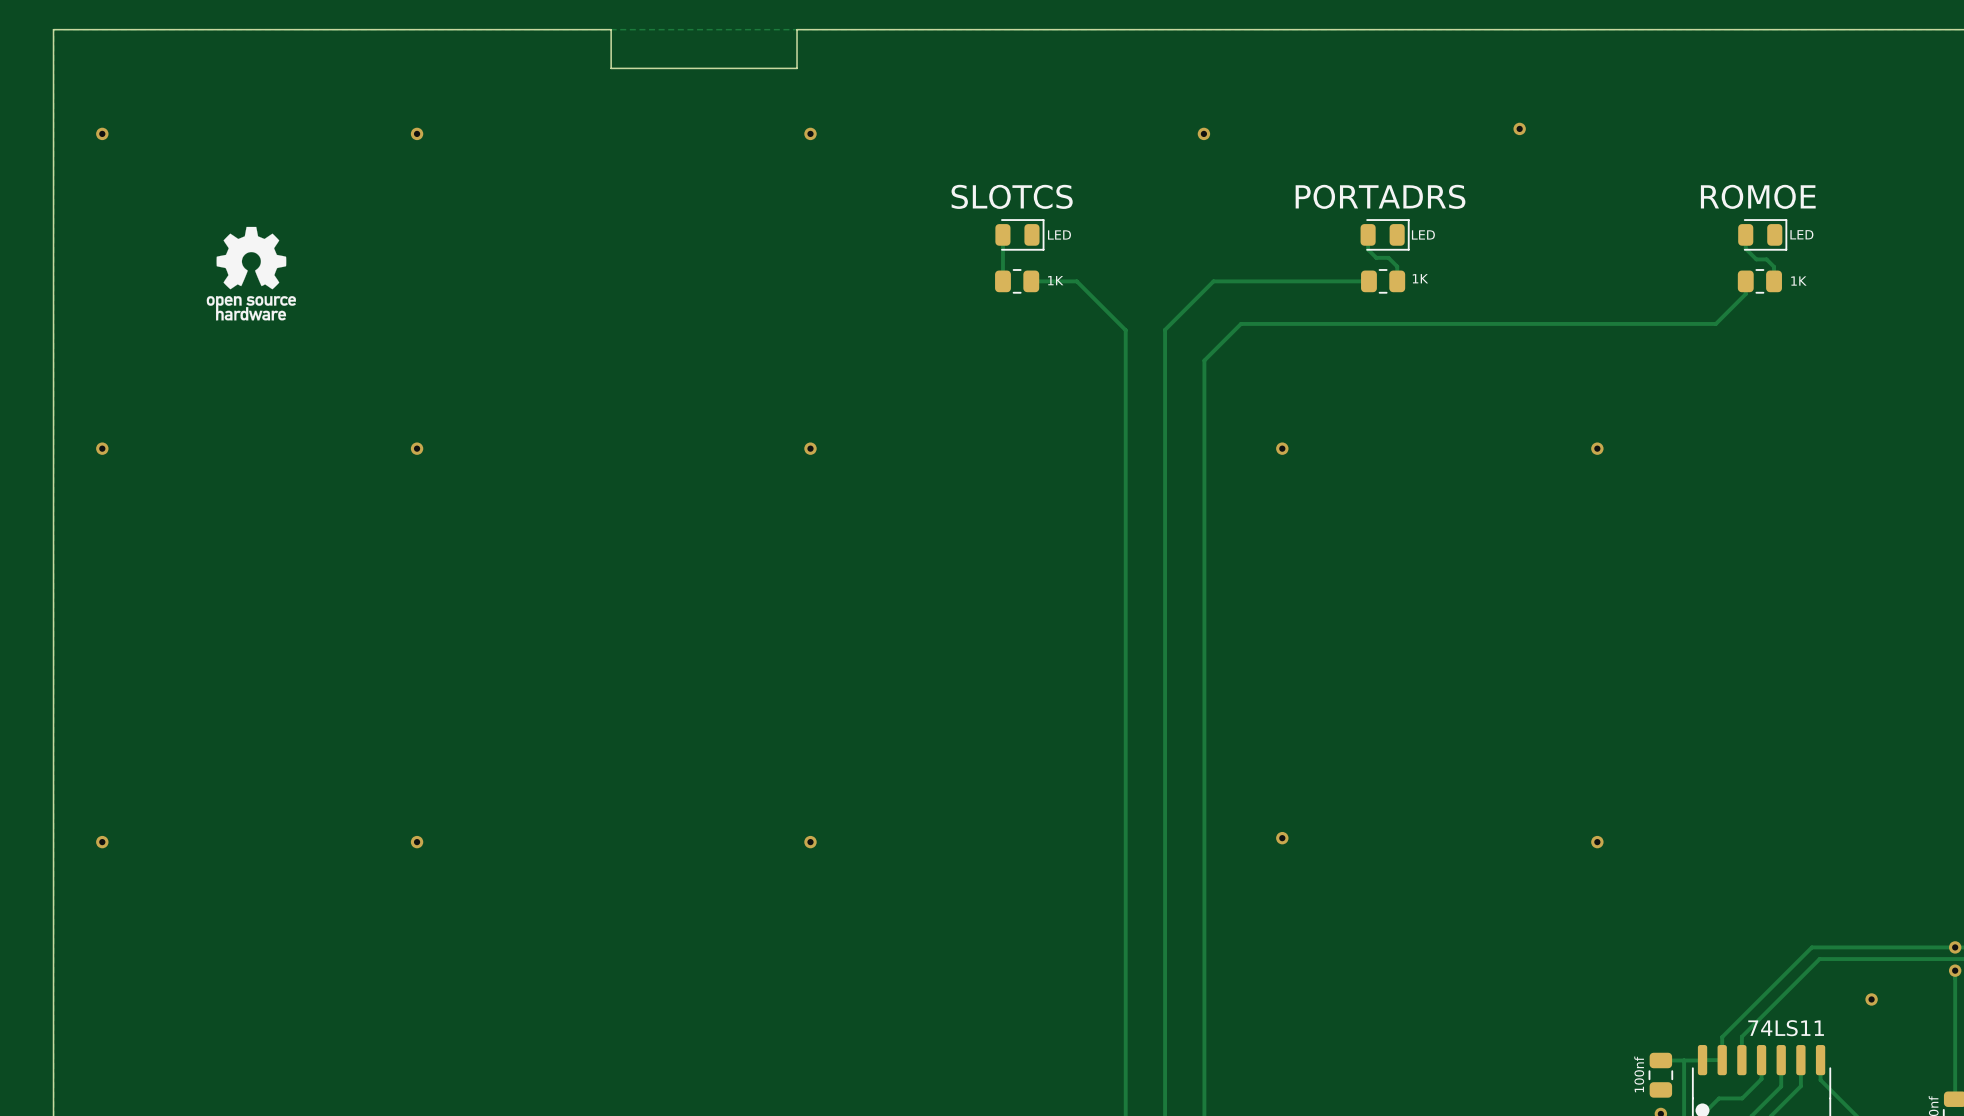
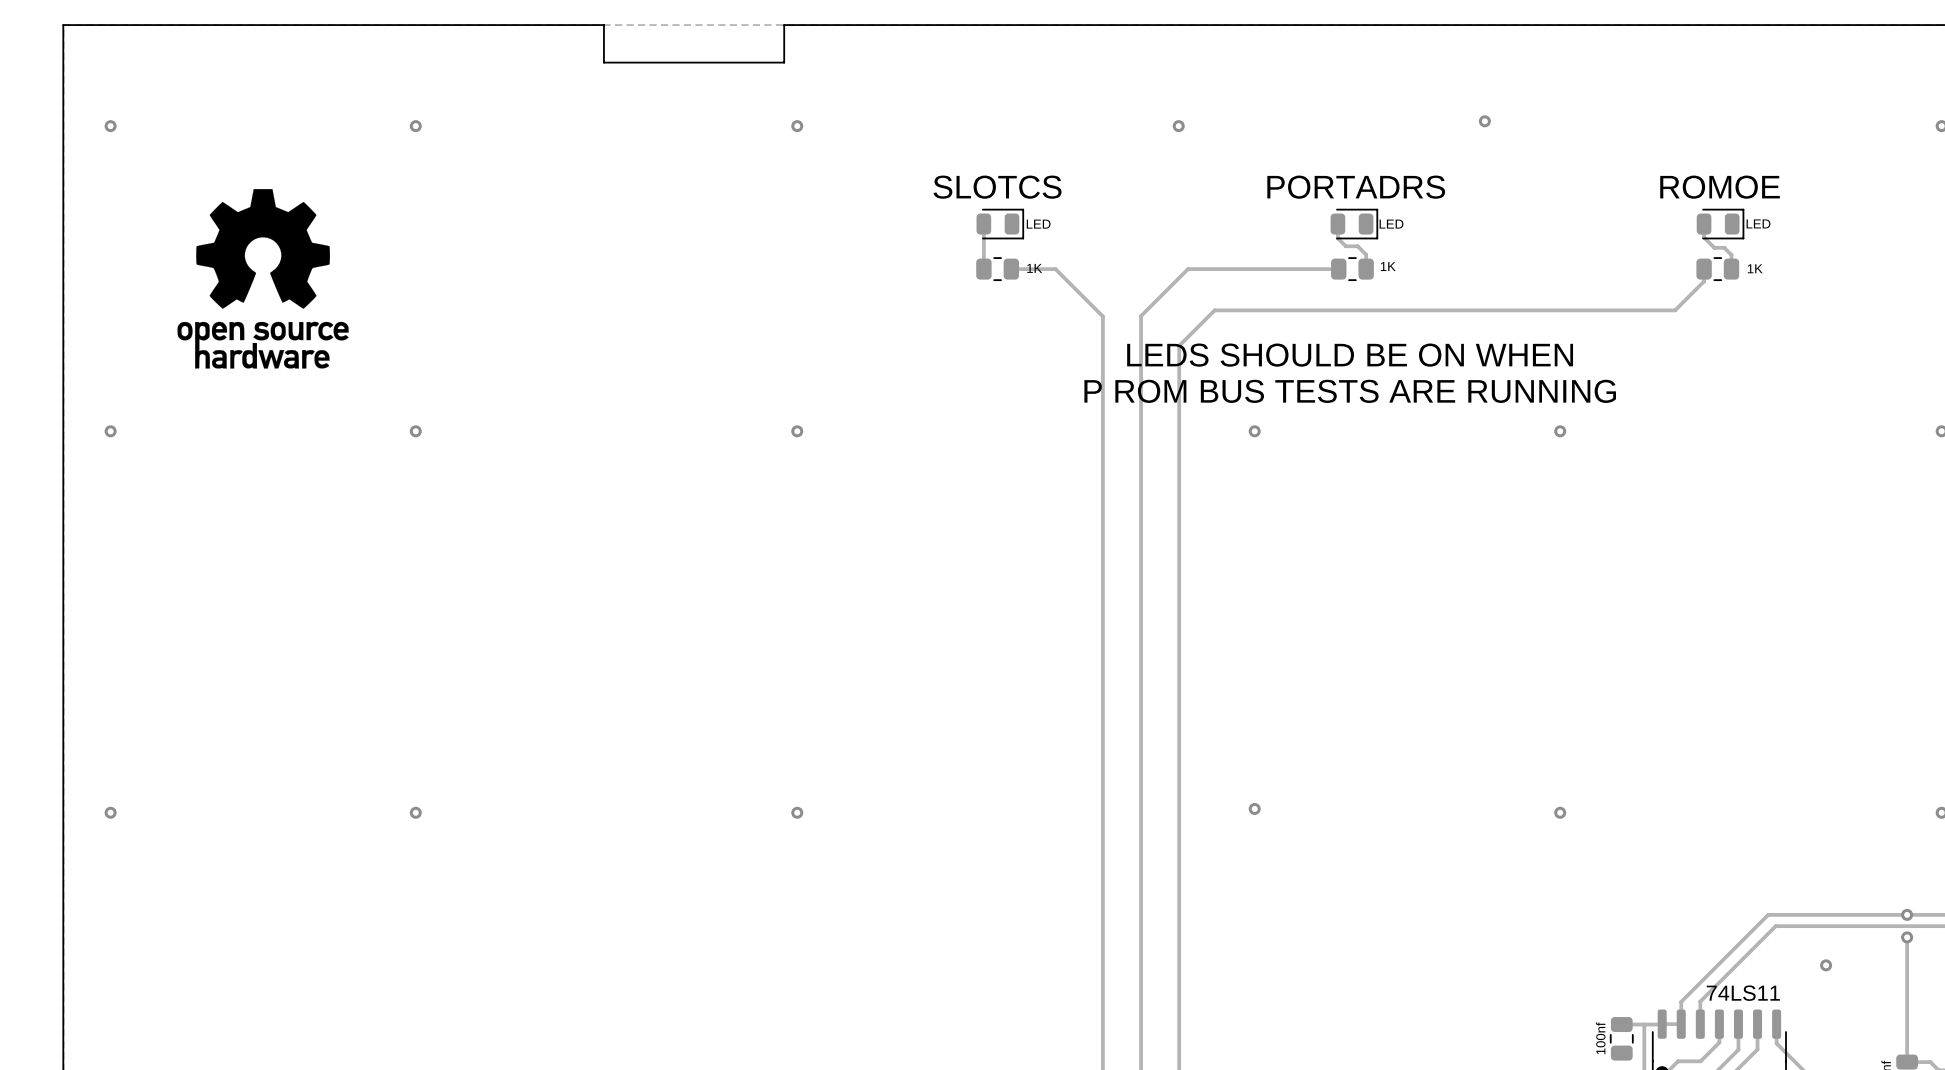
drawing: none -> [177, 189, 349, 369]
drawing: [206, 226, 297, 321] -> none
text: none -> LEDS SHOULD BE ON WHEN (1350, 355)
text: none -> P ROM BUS TESTS ARE RUNNING (1350, 391)

